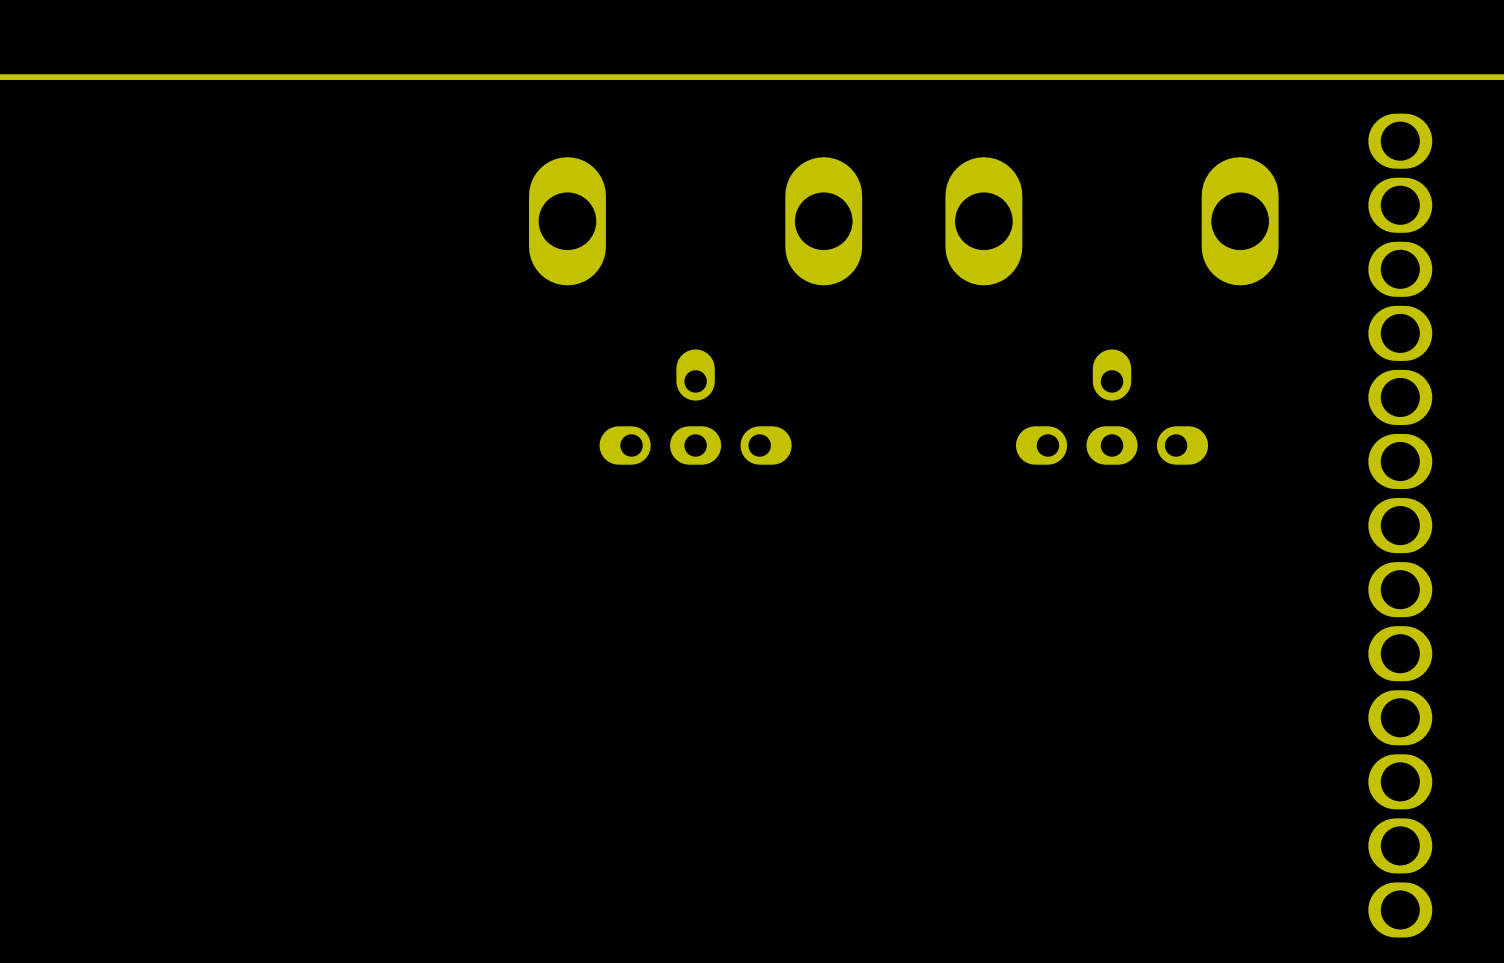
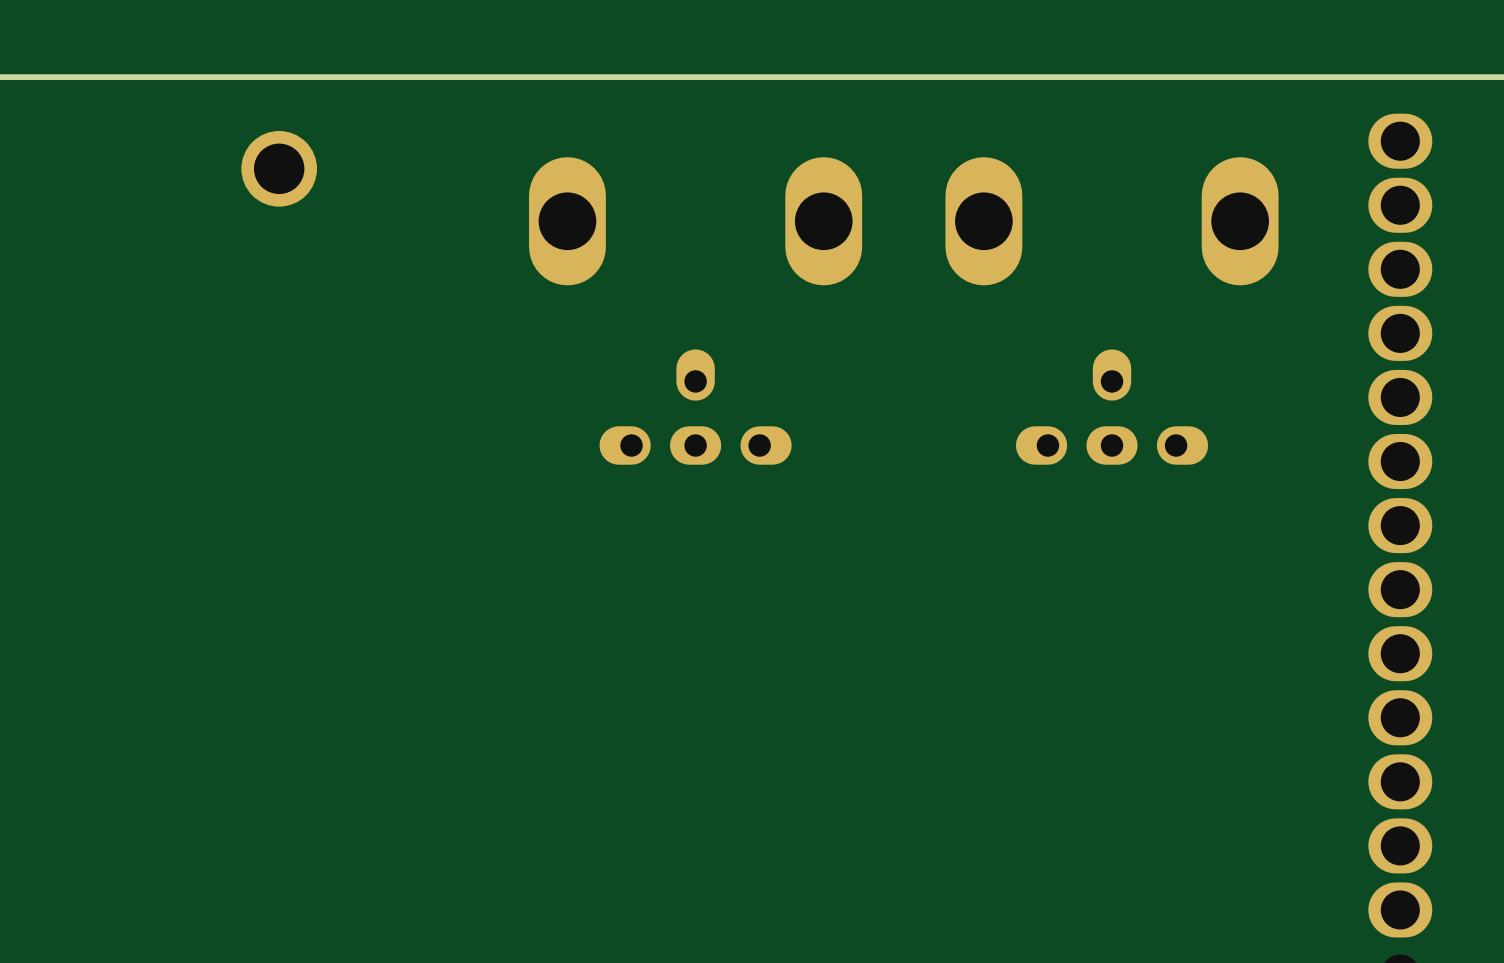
part: none -> (279, 168)

